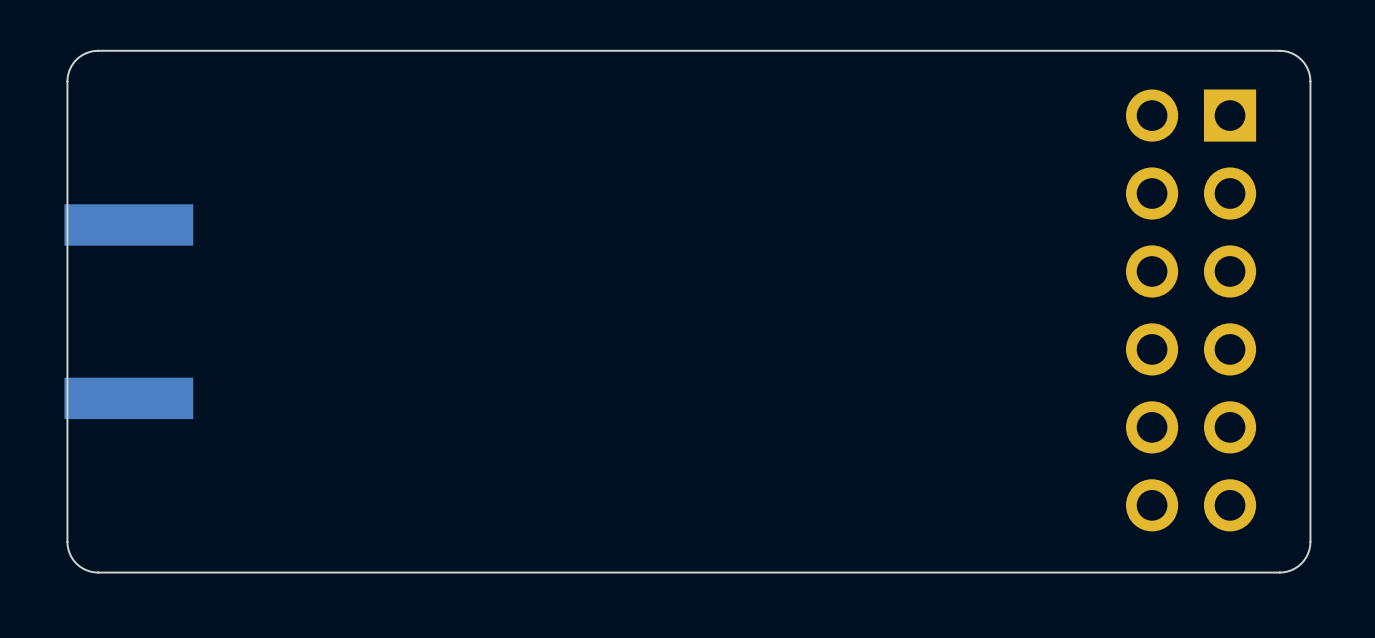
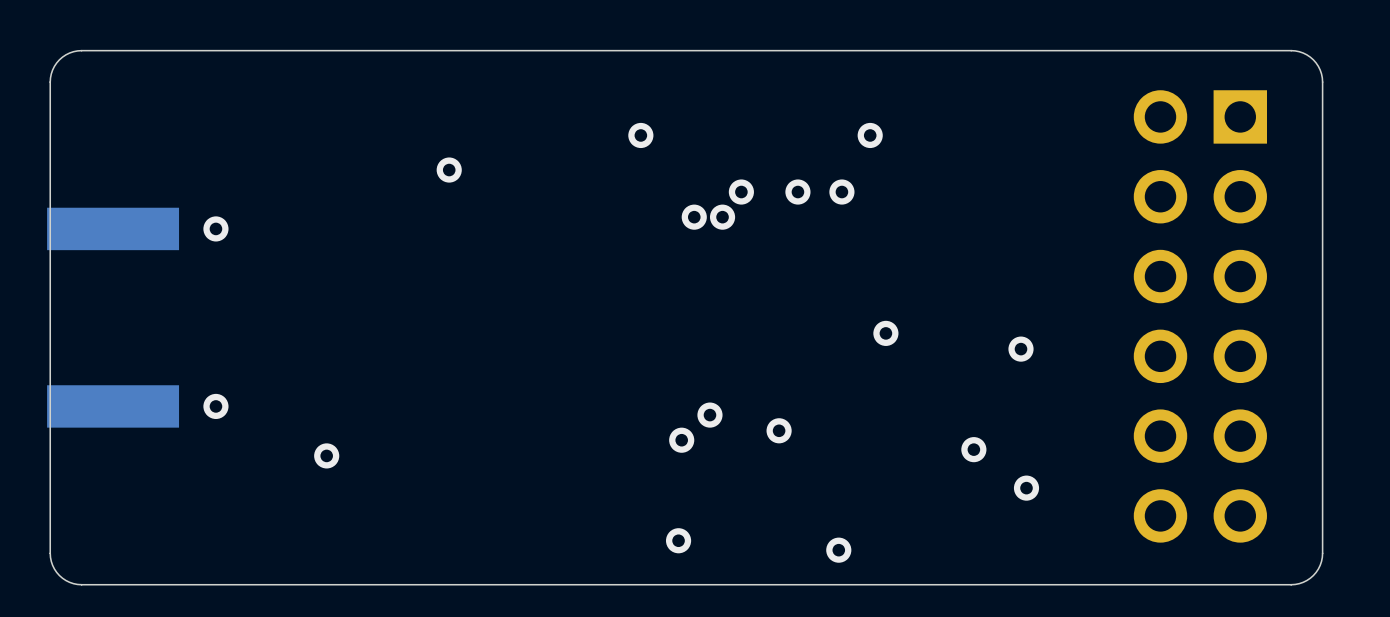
via: none -> (640, 135)
via: none -> (870, 135)
via: none -> (449, 170)
via: none -> (741, 192)
via: none -> (797, 192)
via: none -> (841, 192)
via: none -> (694, 217)
via: none -> (722, 217)
via: none -> (215, 228)
via: none -> (885, 333)
via: none -> (1021, 349)
via: none -> (215, 406)
via: none -> (709, 415)
via: none -> (779, 430)
via: none -> (681, 440)
via: none -> (973, 449)
via: none -> (326, 455)
via: none -> (1026, 488)
via: none -> (678, 540)
via: none -> (838, 550)

